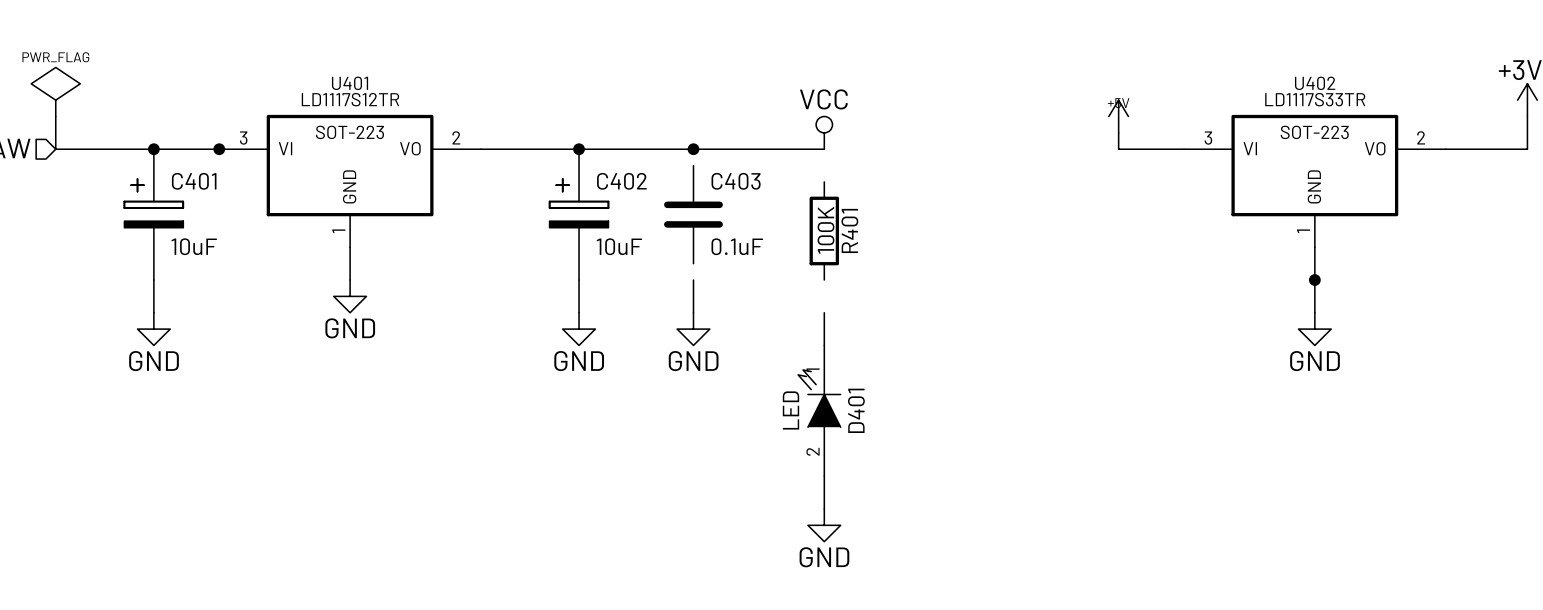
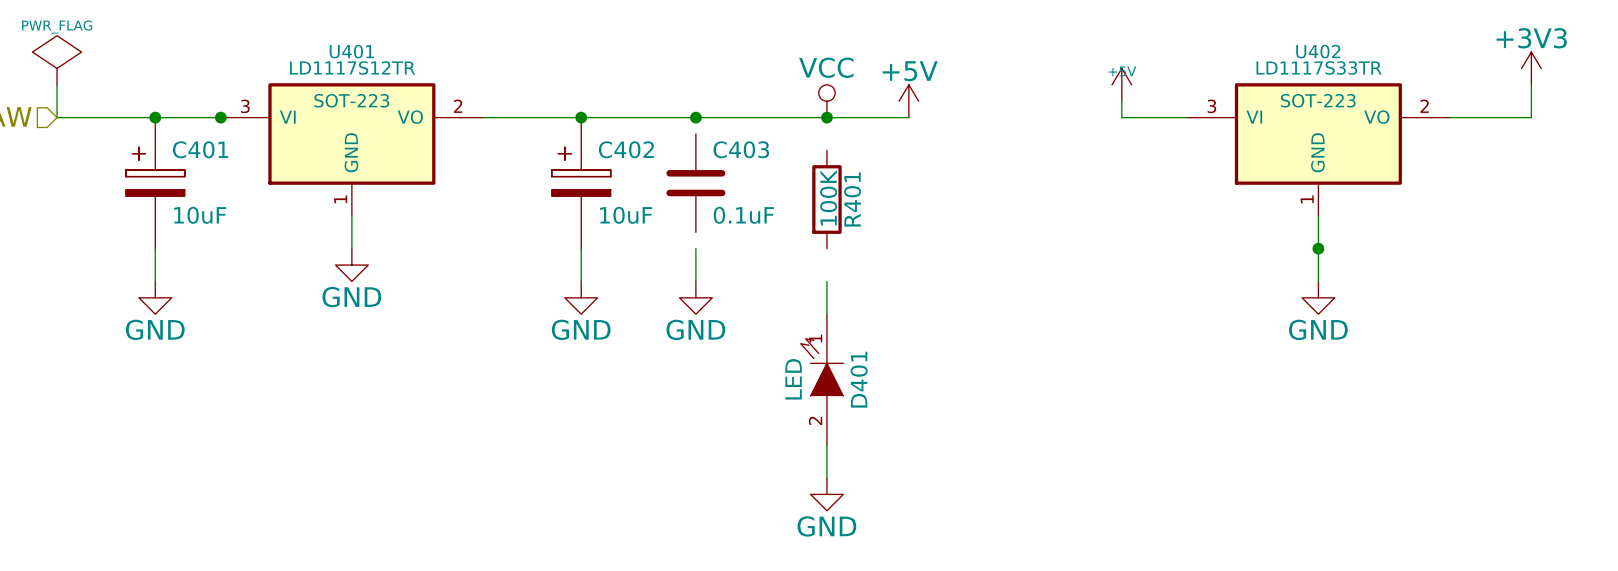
power symbol: none -> +5V (908, 101)
wire: none -> (826, 117) (908, 117)
junction: none -> (826, 117)

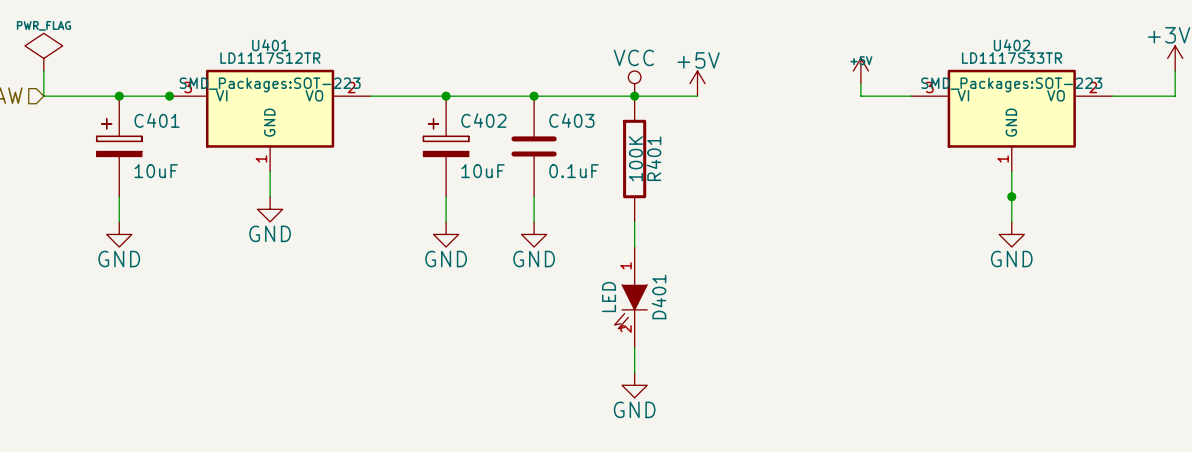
U401 text: SOT-223 (351, 100) -> SMD_Packages:SOT-223 (270, 84)
U402 text: SOT-223 (1318, 100) -> SMD_Packages:SOT-223 (1011, 84)
C403 symbol: [666, 134, 726, 233] -> [511, 96, 557, 197]
R401 symbol: [812, 150, 842, 249] -> [623, 96, 647, 222]
D401 symbol: [800, 314, 844, 446] -> [614, 247, 648, 348]

